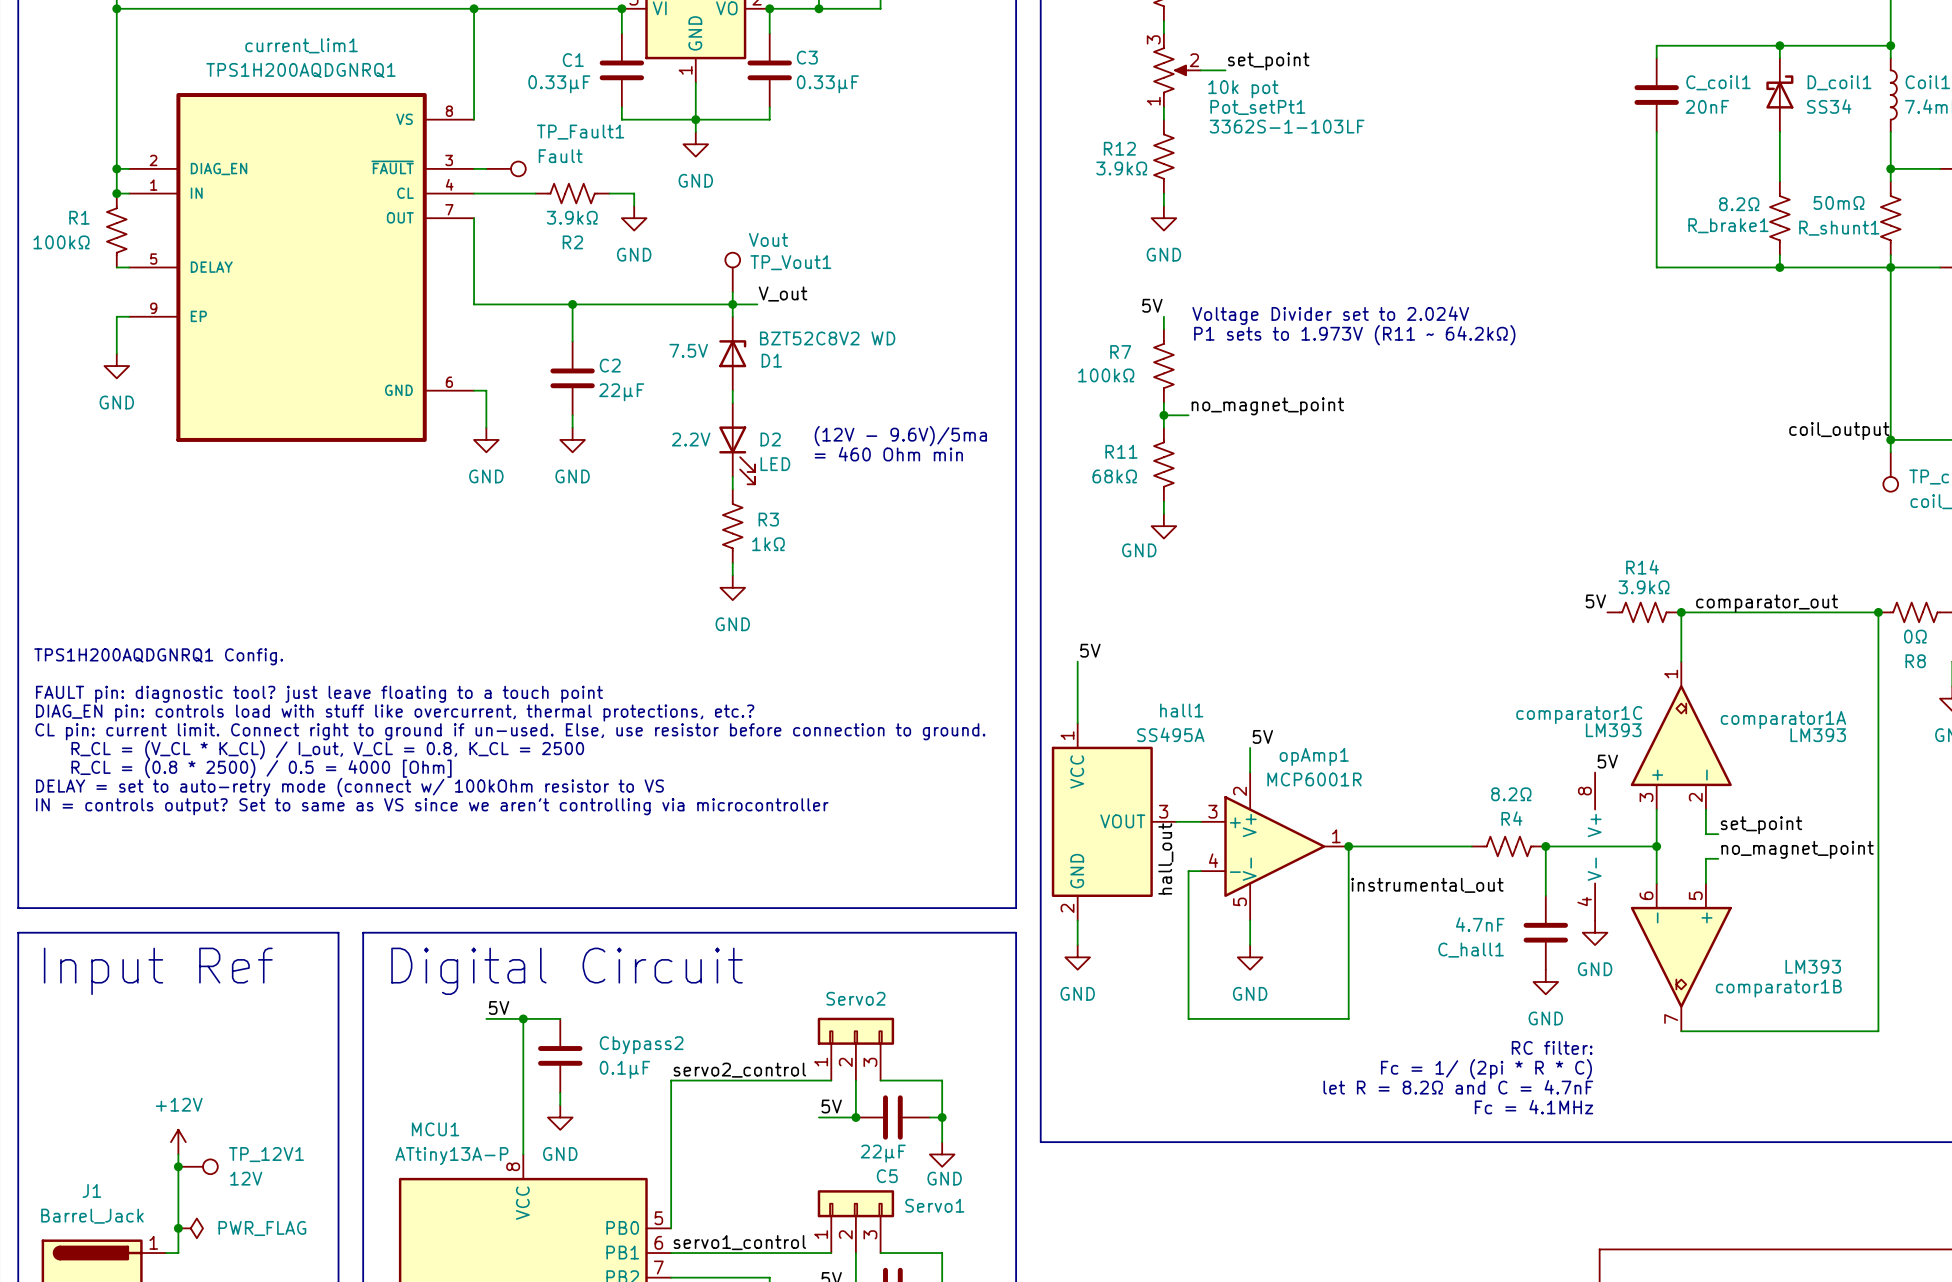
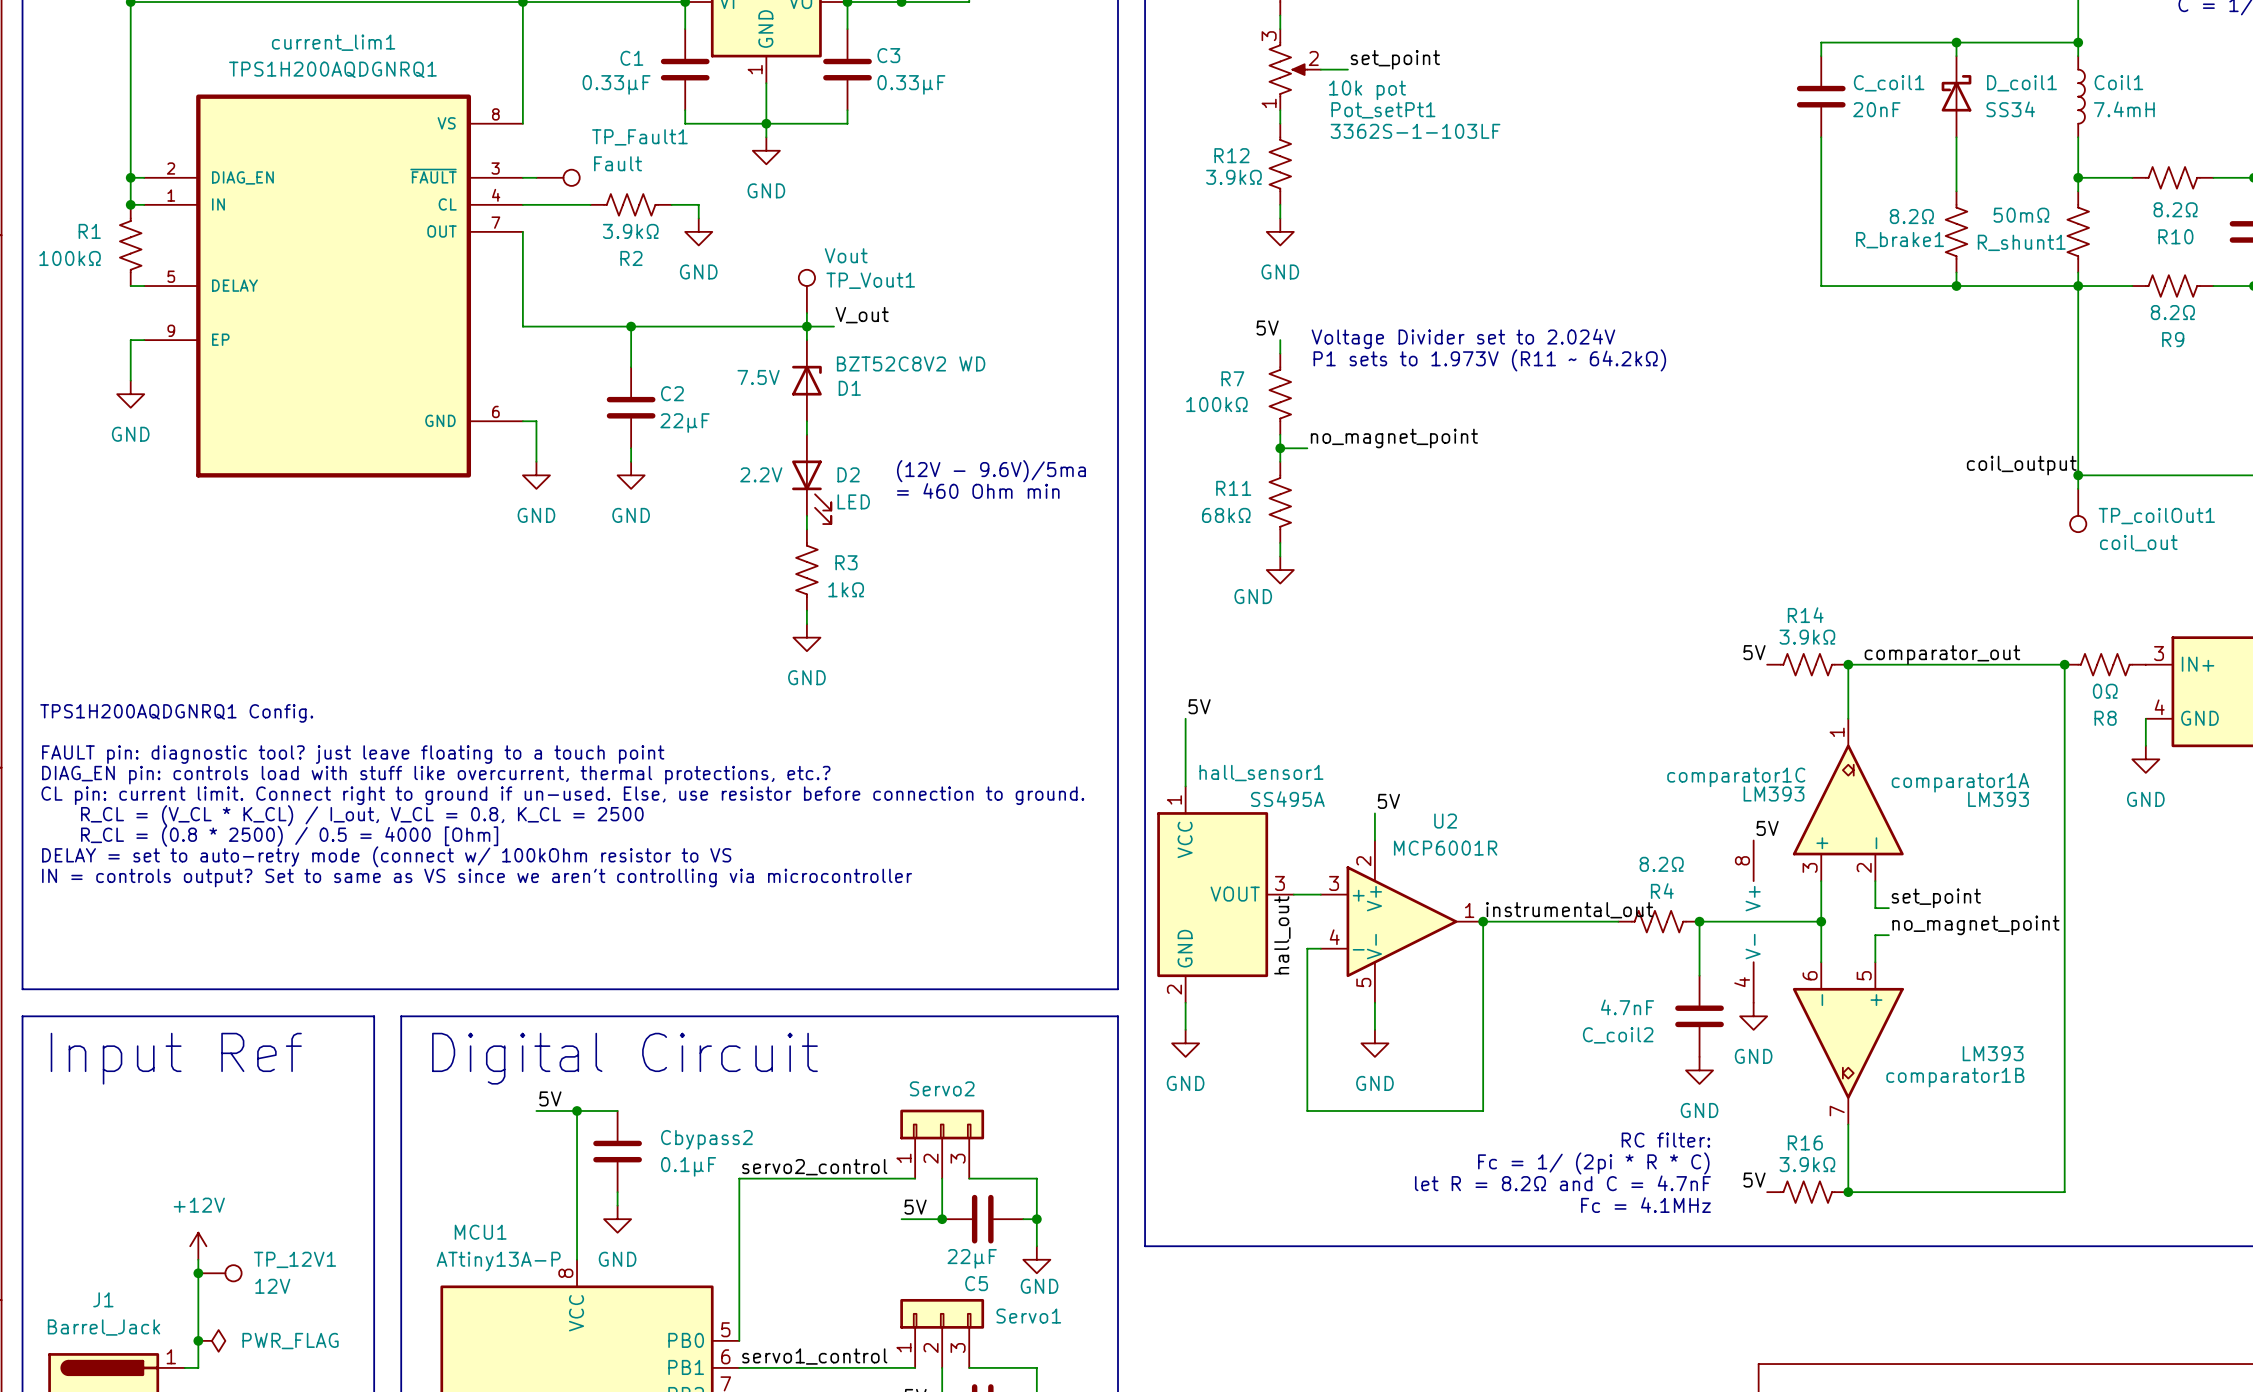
hall1 name: hall1 (1181, 710) -> hall_sensor1 (1261, 773)
opAmp1 name: opAmp1 (1314, 756) -> U2 (1445, 821)
label position: instrumental_out (1427, 885) -> instrumental_out (1569, 910)
C_hall1 name: C_hall1 (1471, 950) -> C_coil2 (1618, 1035)
wire: (1681, 1031) (1878, 1031) -> (1848, 1124) (1848, 1192) (2064, 1192) (2064, 1124)
text position: RC filter: (1552, 1047) -> RC filter: (1665, 1140)
text position: Fc = 1/ (2pi * R * C) (1486, 1069) -> Fc = 1/ (2pi * R * C) (1593, 1163)
label: none -> 5V (1754, 1180)
text position: let R = 8.2Ω and C = 4.7nF (1458, 1087) -> let R = 8.2Ω and C = 4.7nF (1562, 1183)
R16: none -> 3.9kΩ (1807, 1192)
junction: none -> (1848, 1192)
text position: Fc = 4.1MHz (1533, 1107) -> Fc = 4.1MHz (1645, 1205)

